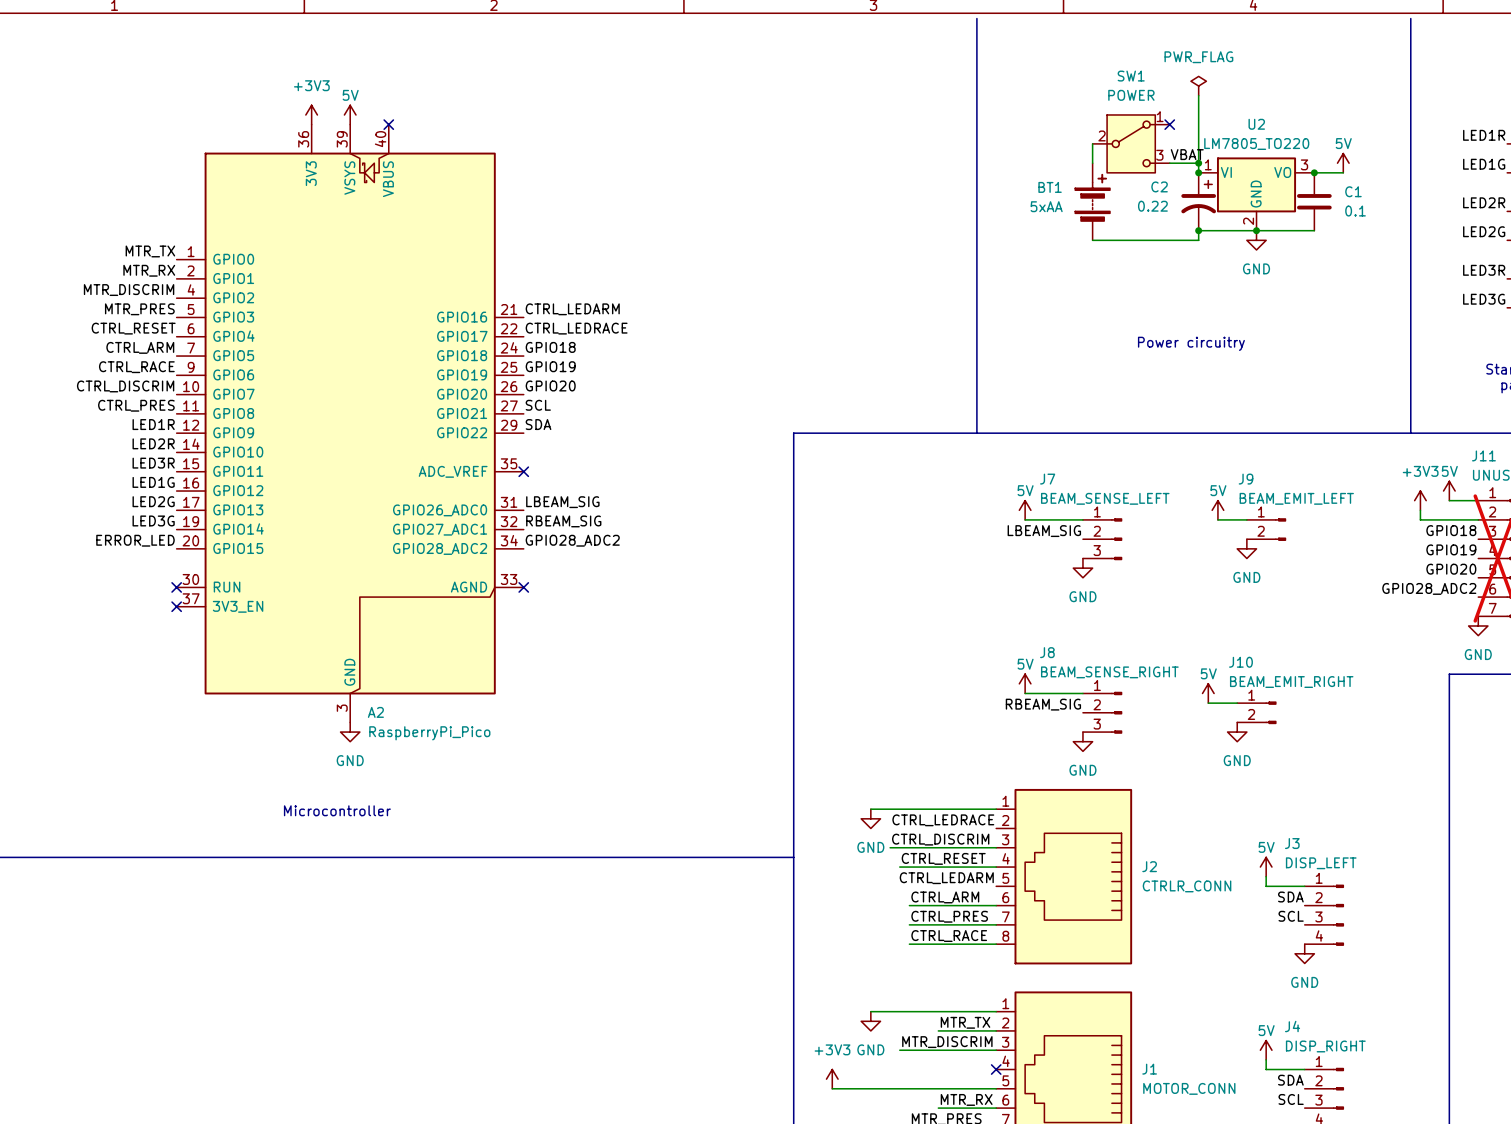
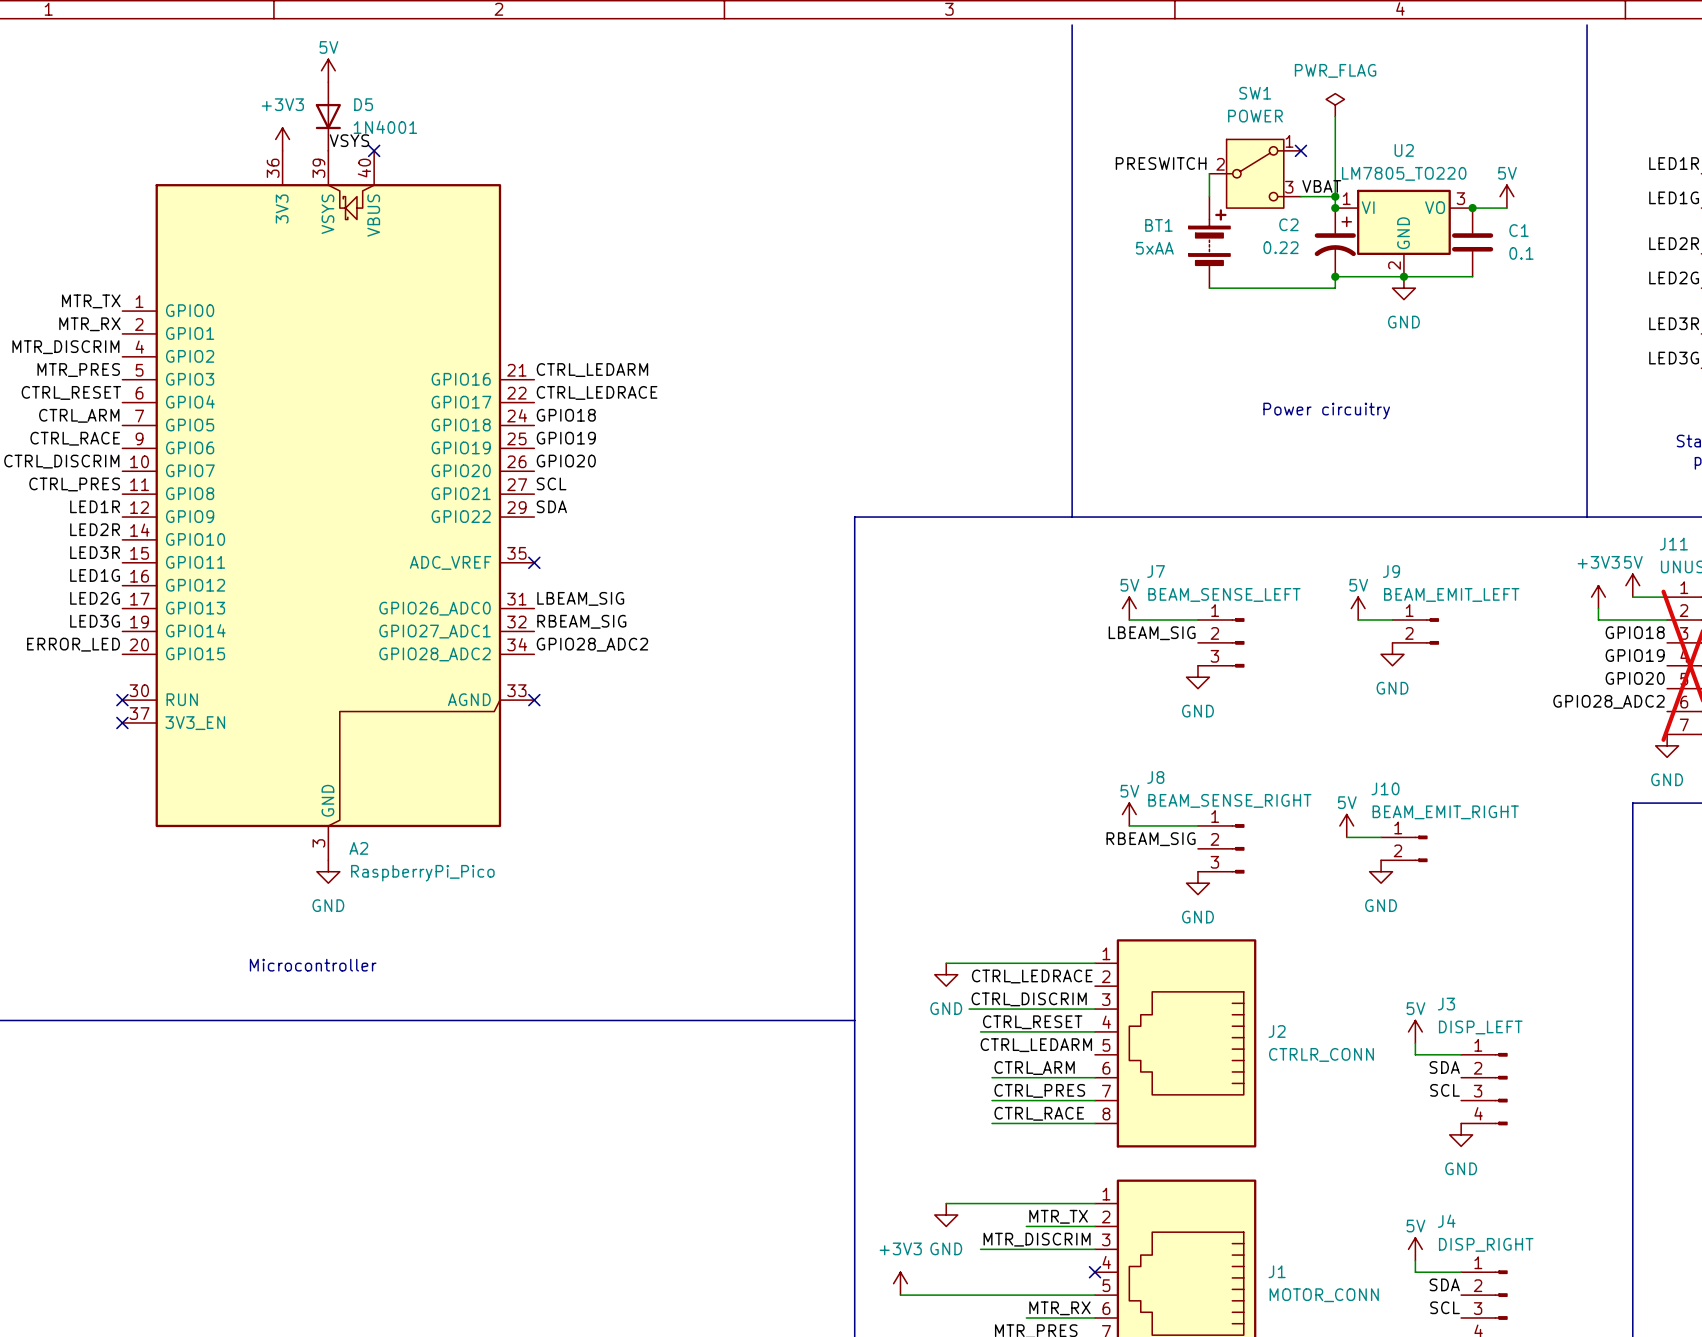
D5: none -> 1N4001 (328, 116)
power symbol position: 5V (350, 114) -> 5V (328, 70)
label: none -> VSYS (349, 140)
label: none -> PRESWITCH (1161, 163)

